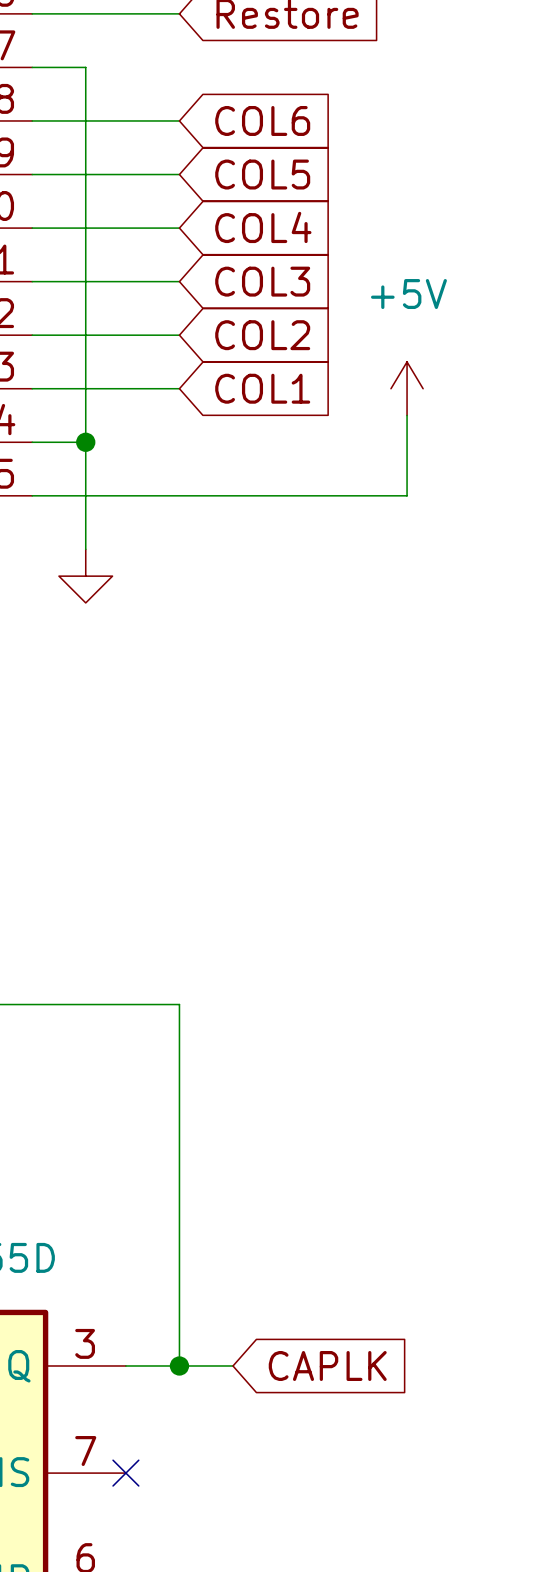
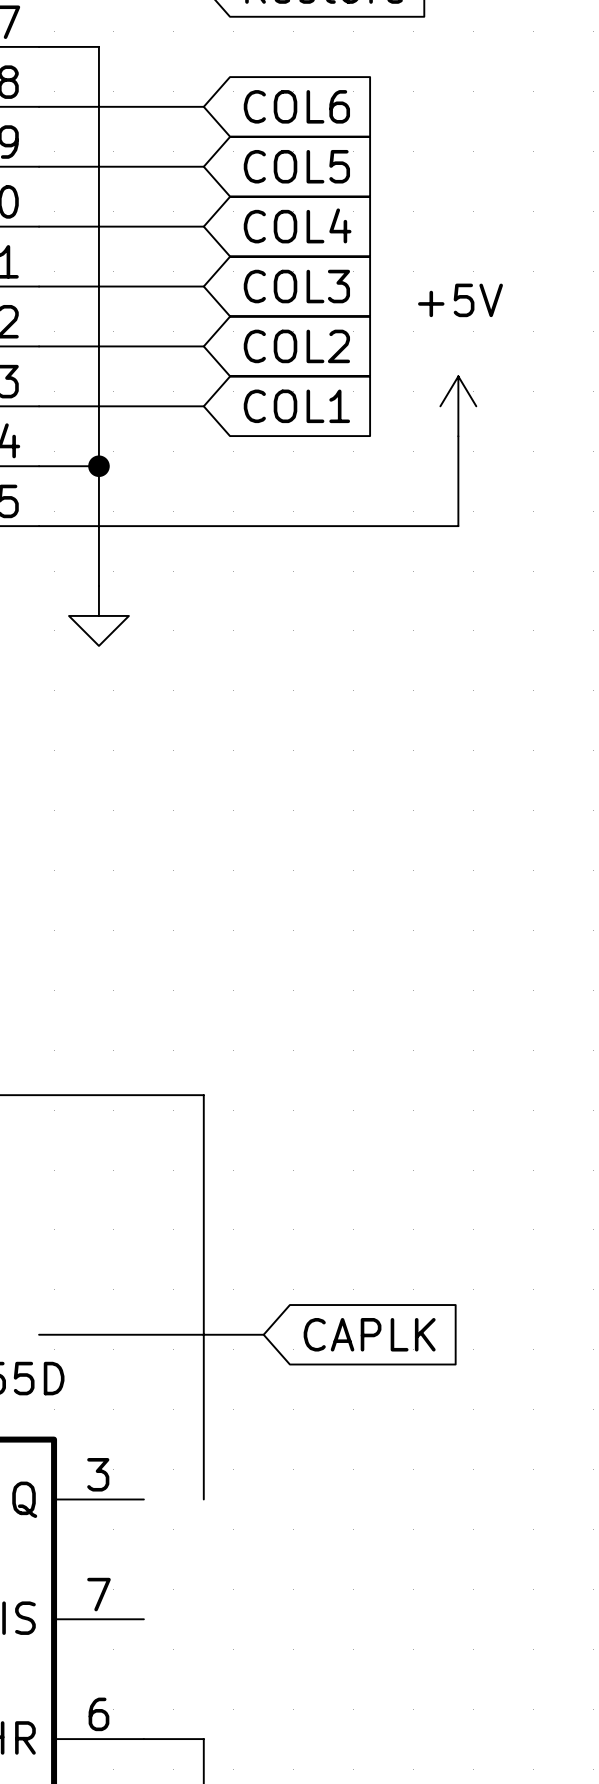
wire: none -> (39, 1334) (263, 1334)
wire: (125, 1365) (233, 1365) -> none
junction: (179, 1365) -> none
global label position: CAPLK (327, 1365) -> CAPLK (369, 1334)
no-connect mark: (125, 1473) -> none

